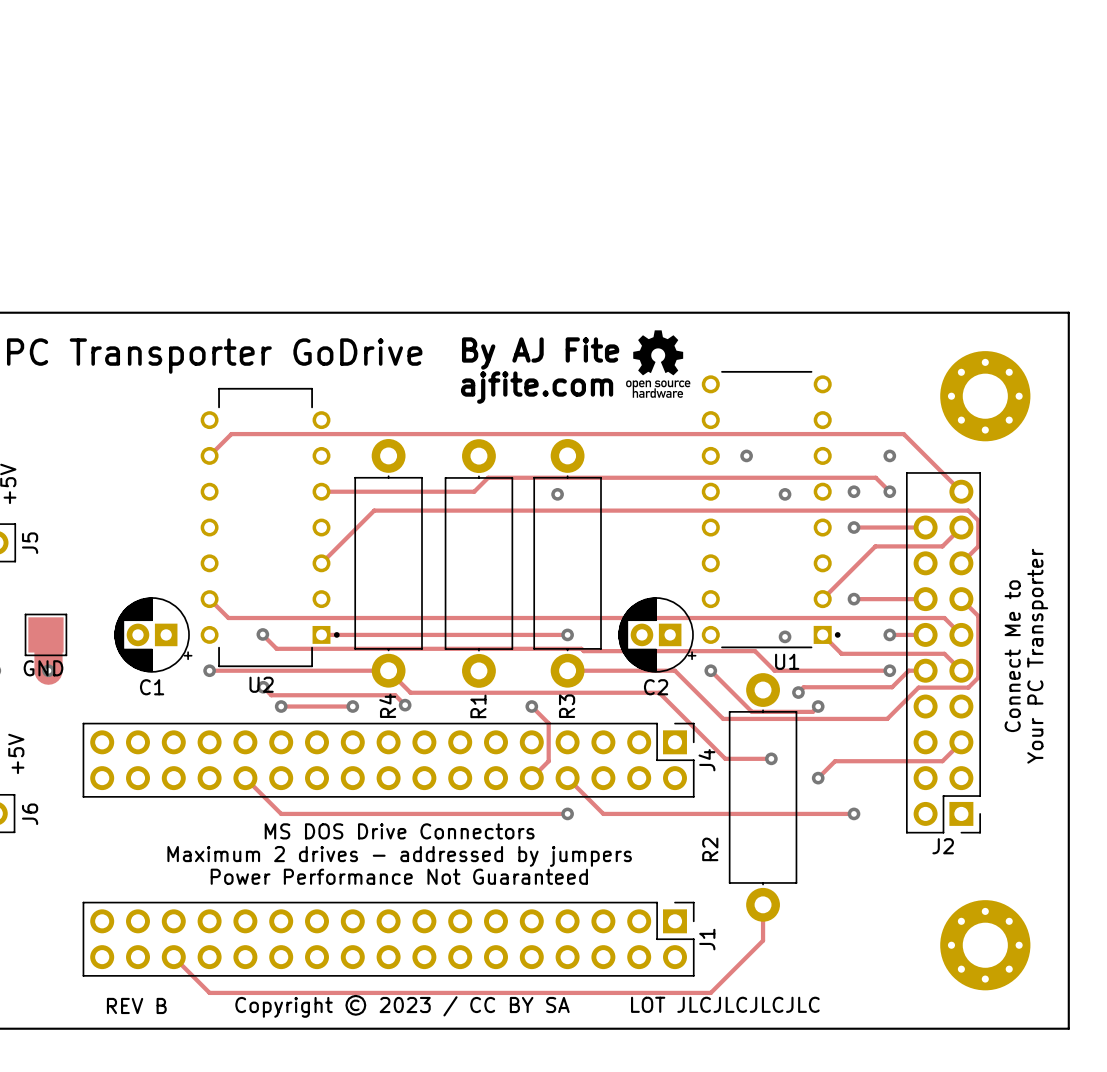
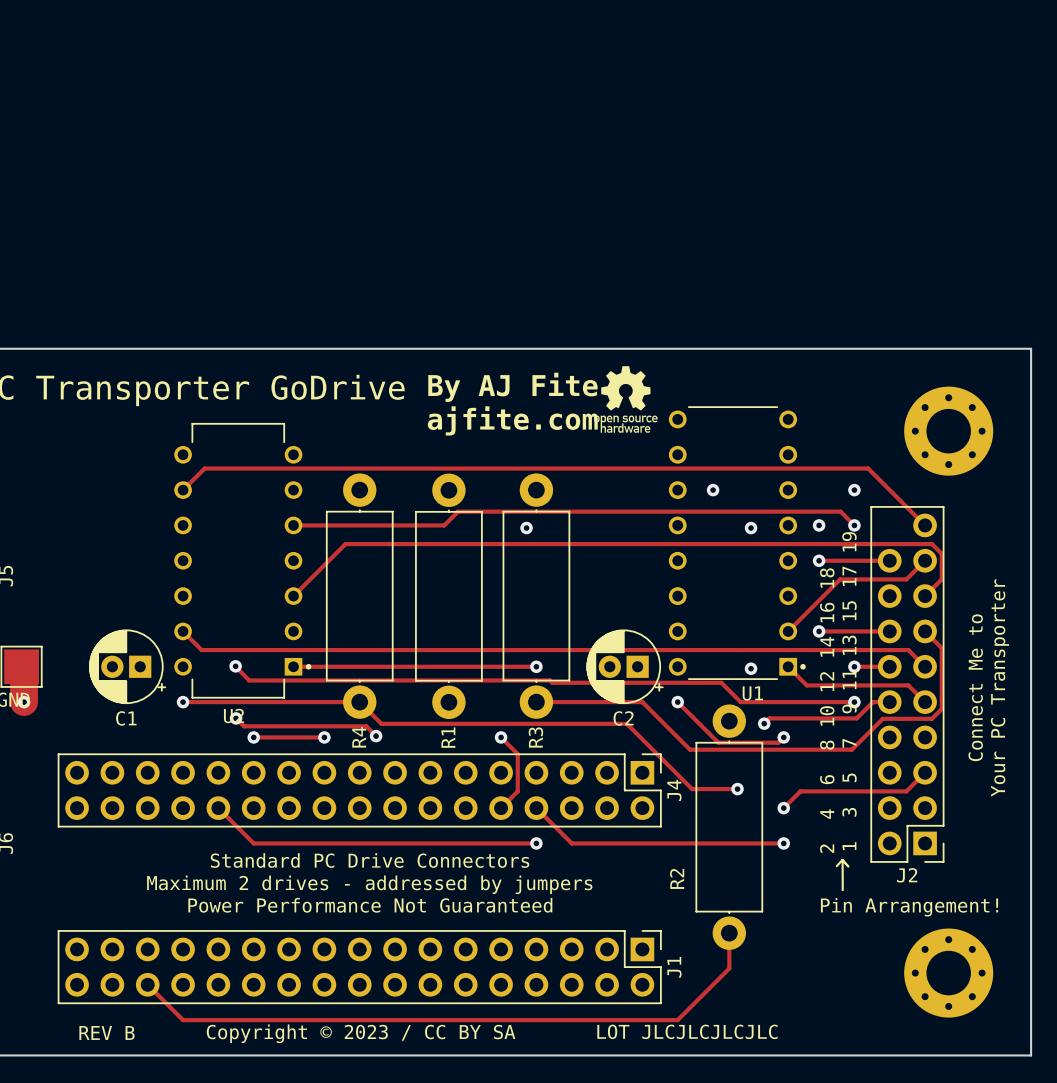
text: none -> 1 3 5 7 9 11 13 15 17 19 (849, 691)
text: none -> 2 4 6 8 10 12 14 16 18 (827, 710)
track: (818, 813) (853, 813) -> none
via position: (853, 813) -> (783, 843)
line: none -> (842, 860) (836, 866)
text: MS DOS Drive Connectors (399, 831) -> Standard PC Drive Connectors (370, 860)
line: none -> (848, 866) (842, 860) (842, 890)
text: none -> Pin Arrangement! (909, 907)

